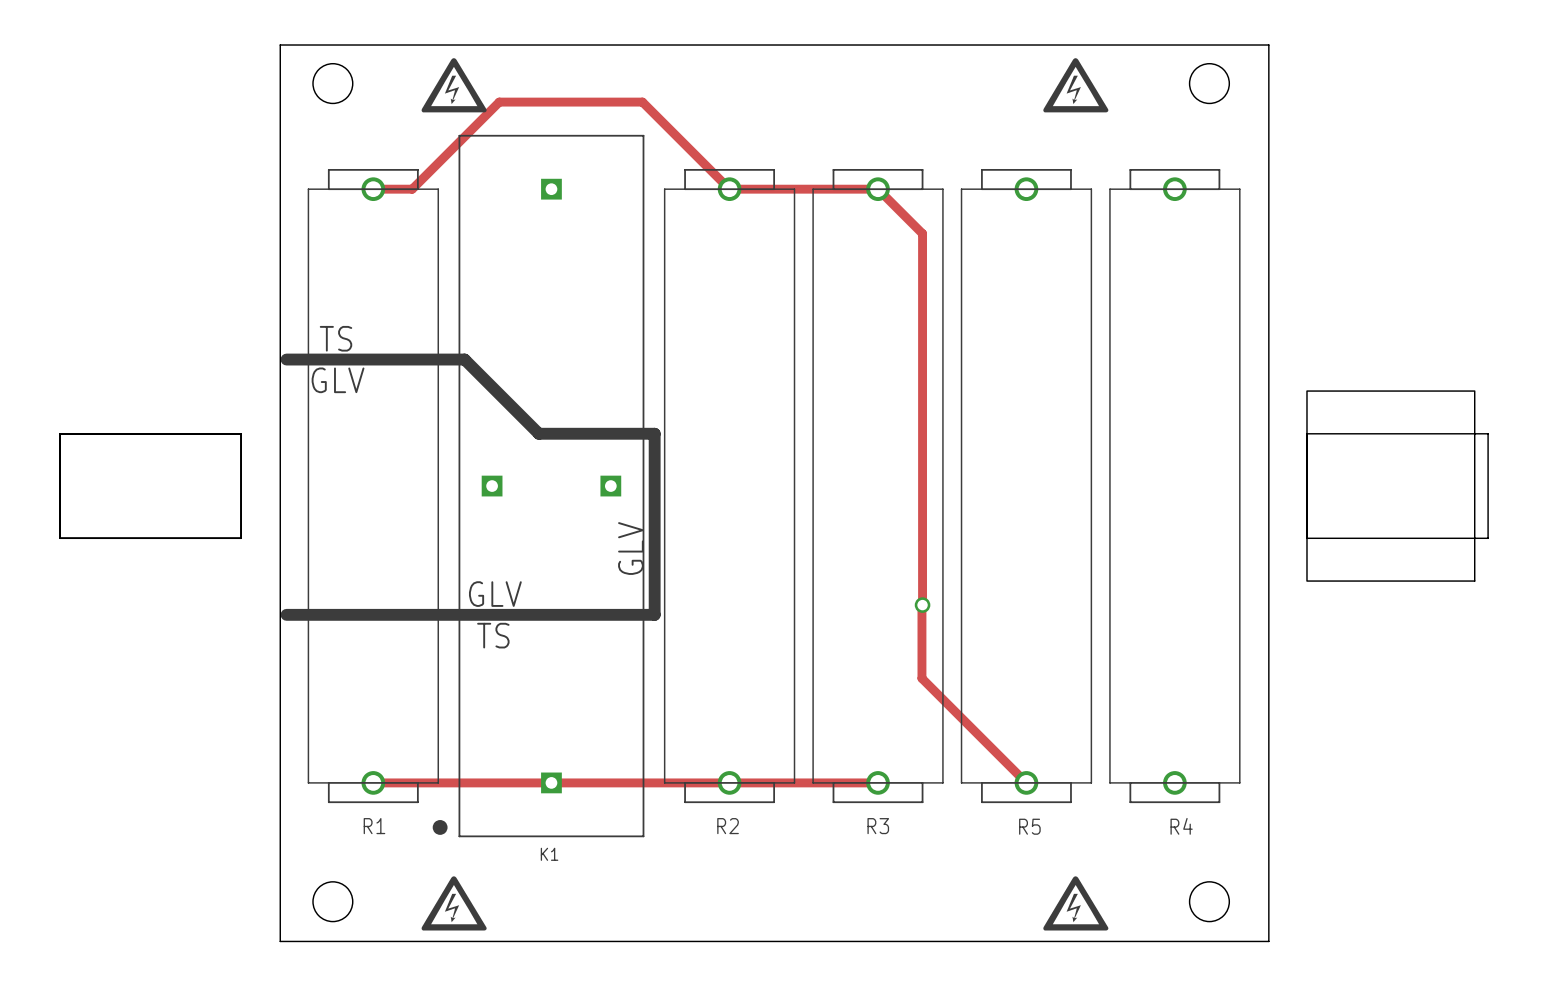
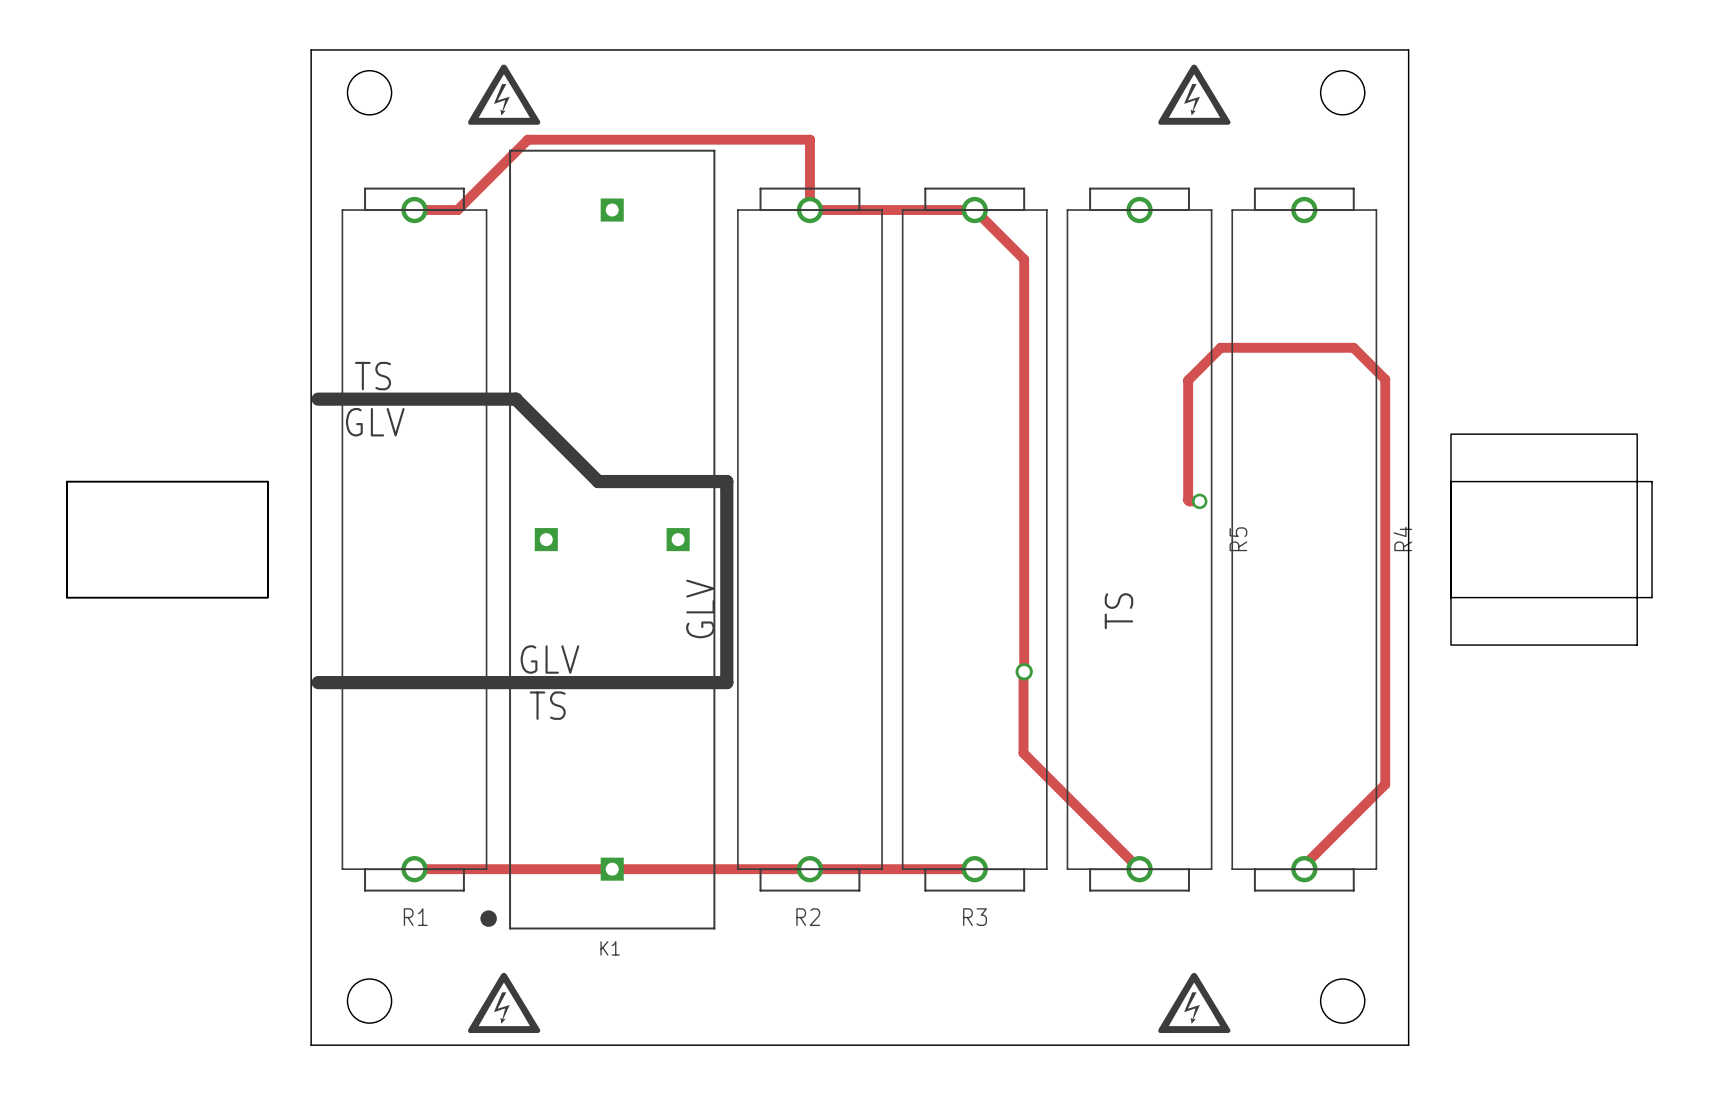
track: (475, 125) (499, 102) (642, 102) (729, 189) -> (527, 139) (809, 139) (809, 210)
track: none -> (1199, 501) (1188, 500) (1188, 380) (1220, 347) (1353, 347) (1385, 379) (1385, 784) (1304, 865) (1304, 869)
via: none -> (1199, 501)
drawing: none -> [1104, 593, 1134, 630]
R5 name rotation: 0° (1029, 826) -> 90° counterclockwise (1238, 539)
R5 name position: R5 (1029, 826) -> R5 (1238, 539)
R4 name rotation: 0° (1181, 826) -> 90° counterclockwise (1402, 538)
R4 name position: R4 (1181, 826) -> R4 (1402, 538)

